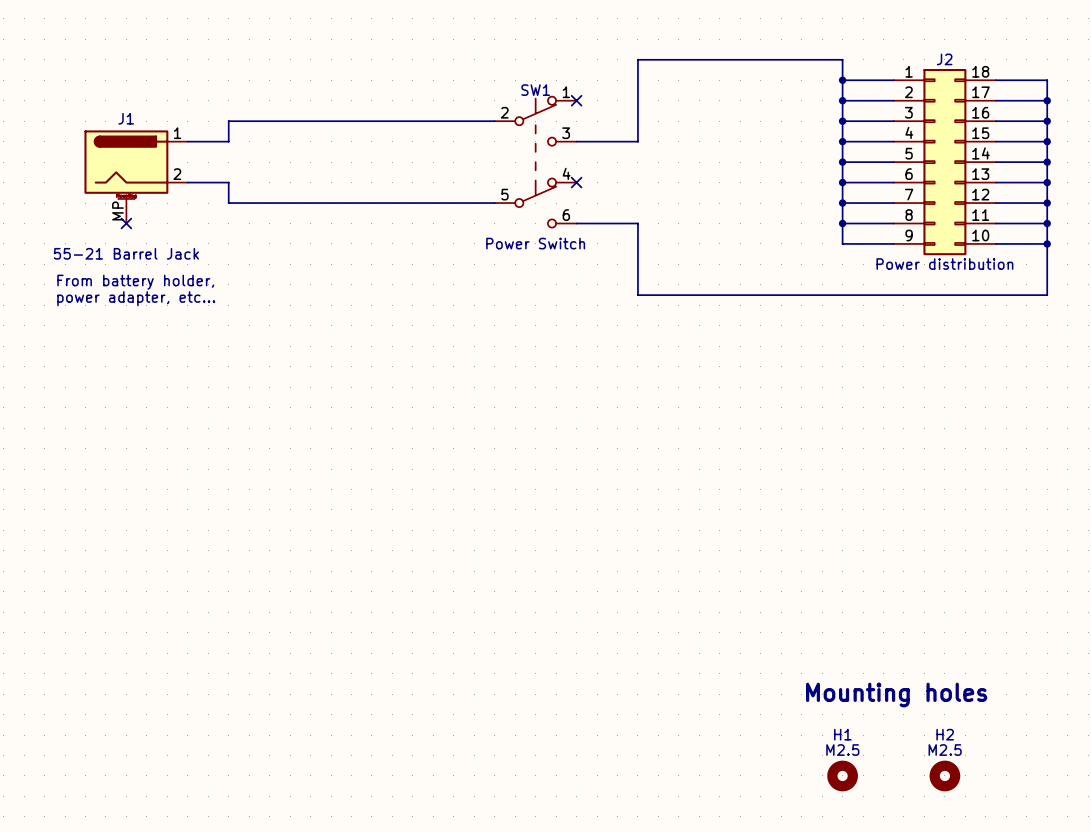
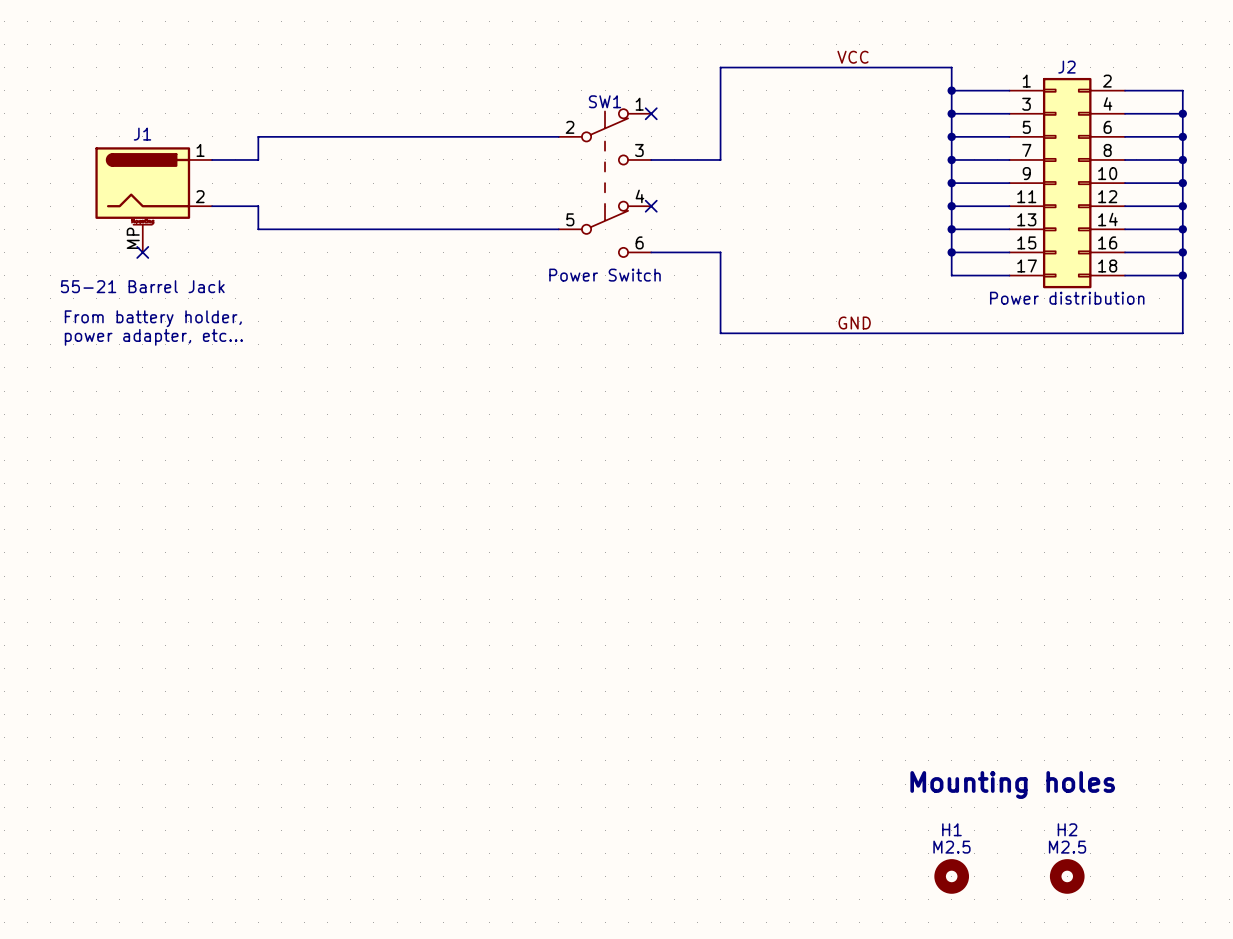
label: none -> VCC (852, 57)
J2 symbol: [893, 69, 997, 256] -> [1009, 77, 1126, 289]
label: none -> GND (854, 323)

